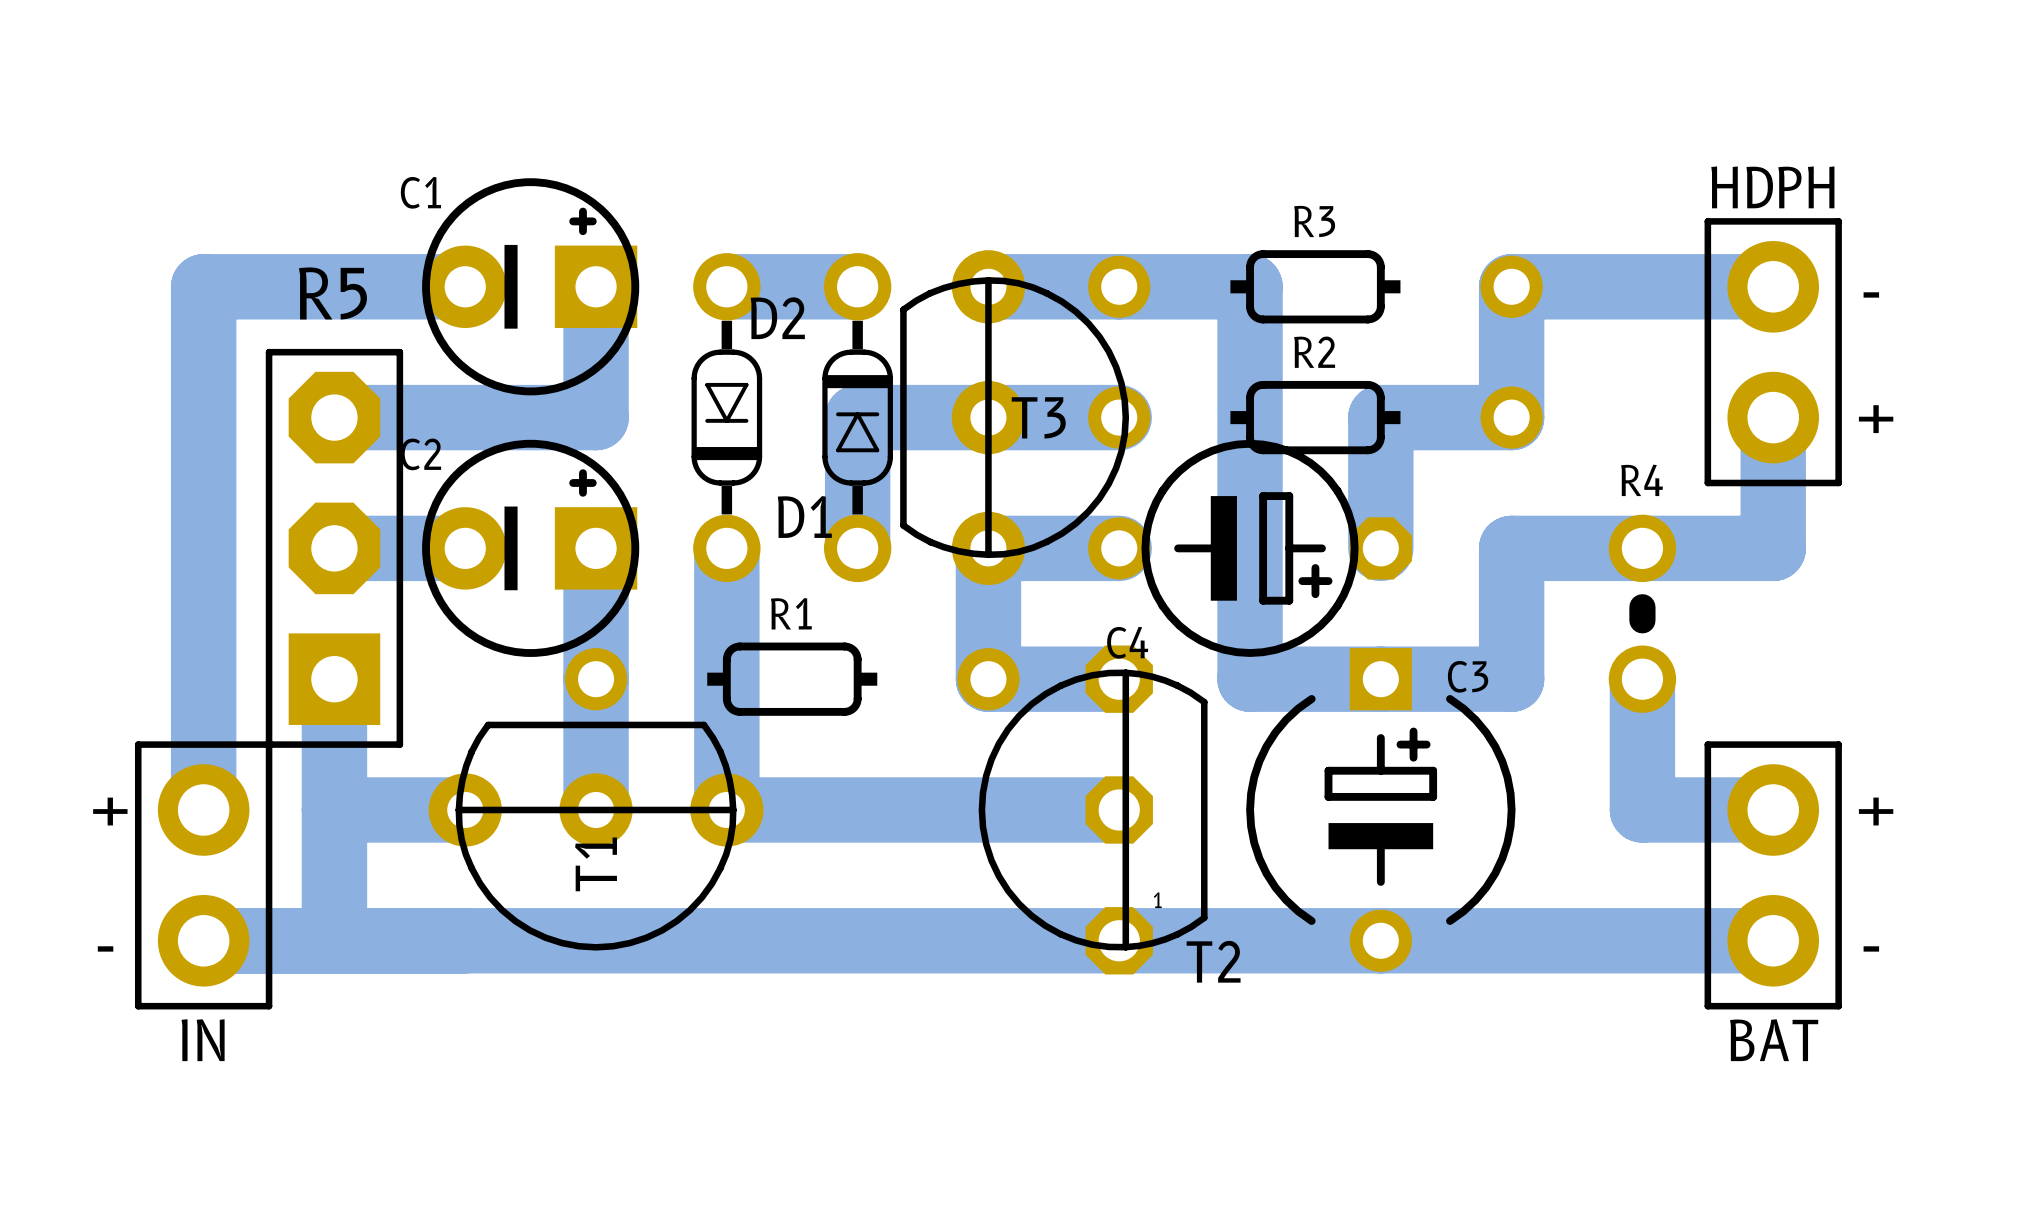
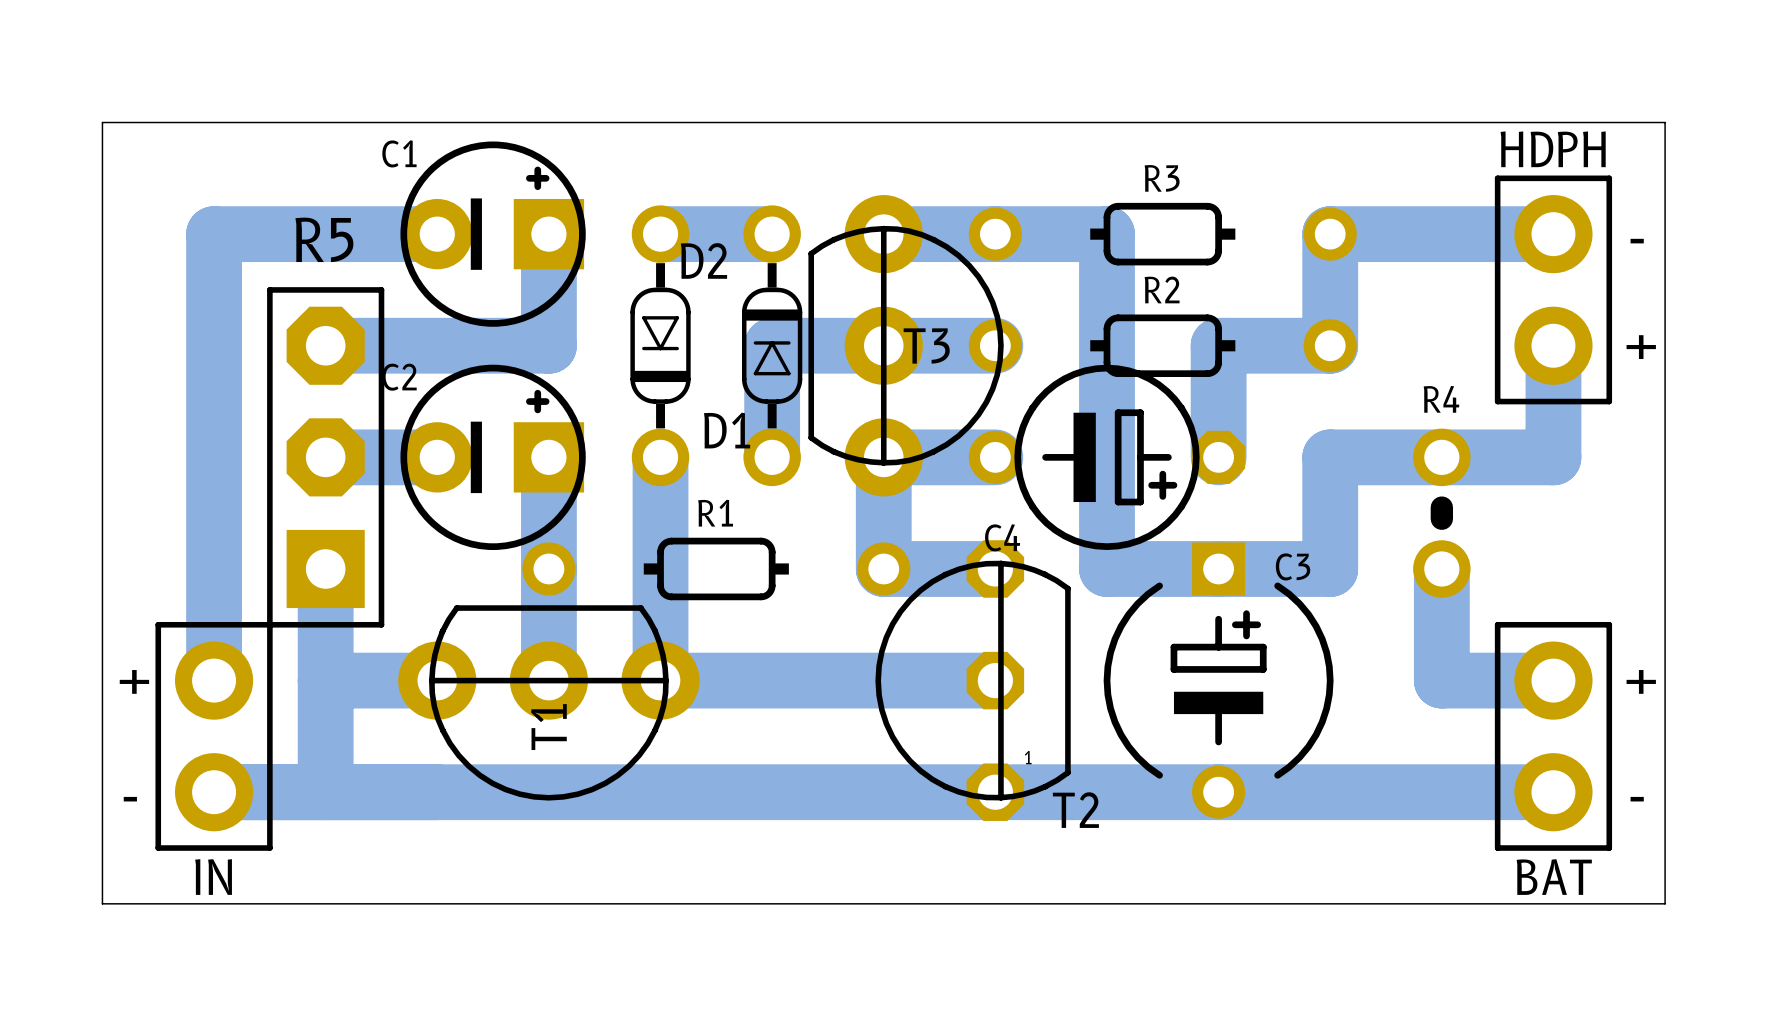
board edge: none -> (102, 122) (1665, 122) (1665, 903) (102, 903) (102, 122)
T3 footprint: [900, 250, 1130, 586] -> [808, 195, 1004, 497]
T1 footprint: [428, 721, 764, 951] -> [398, 605, 700, 801]

